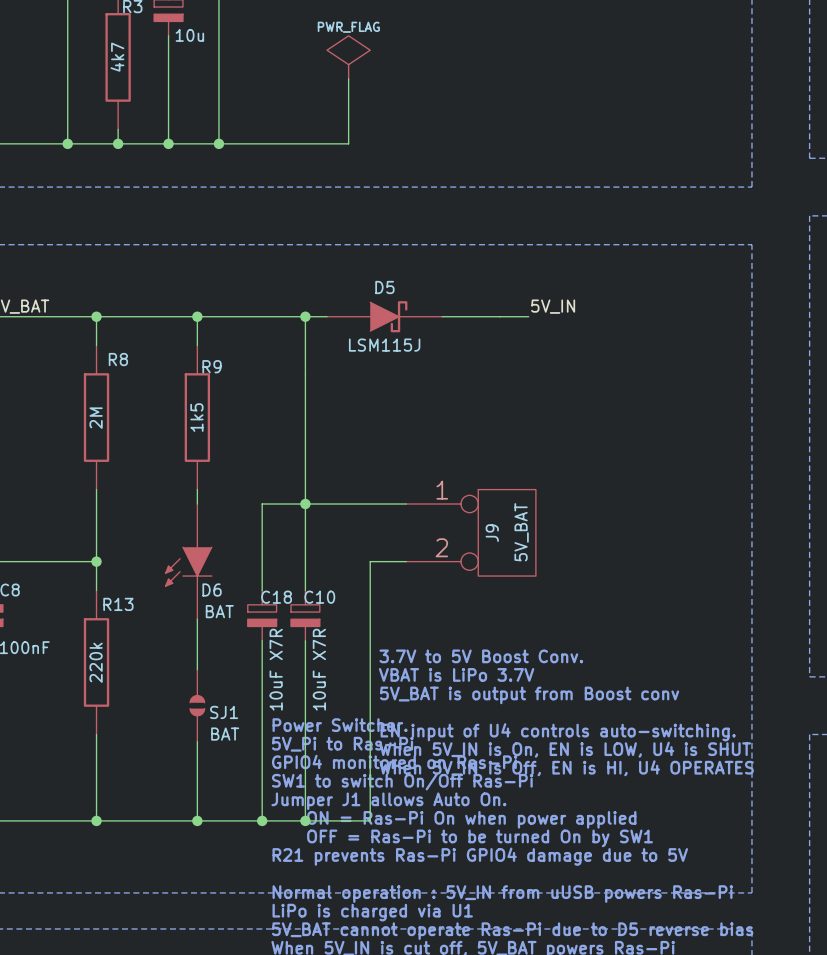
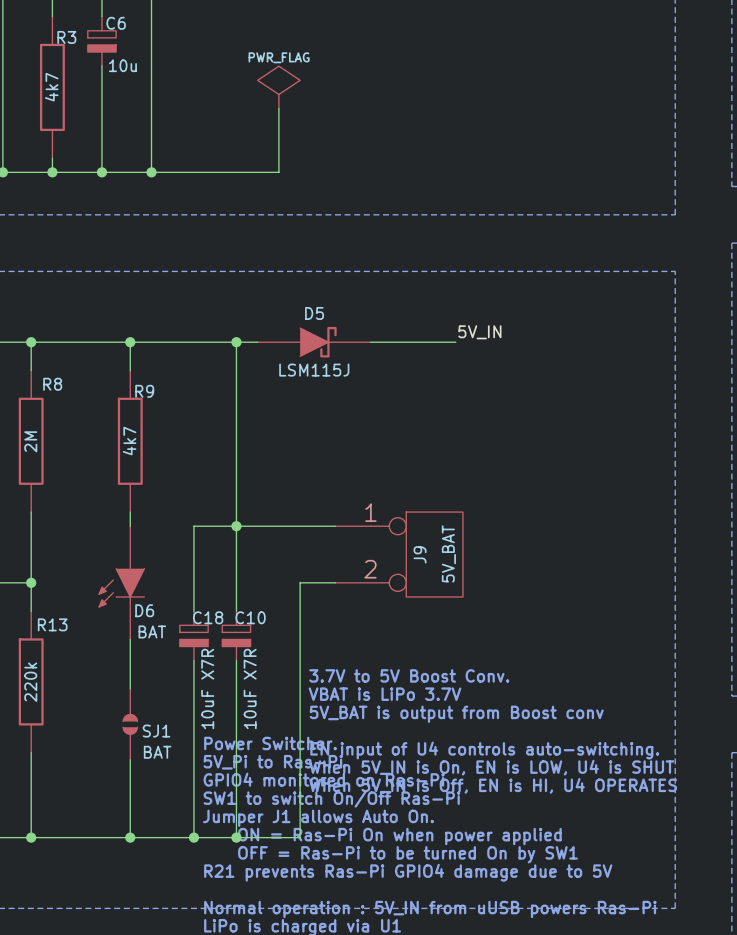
R9 value: 1k5 (196, 417) -> 4k7 (129, 441)

